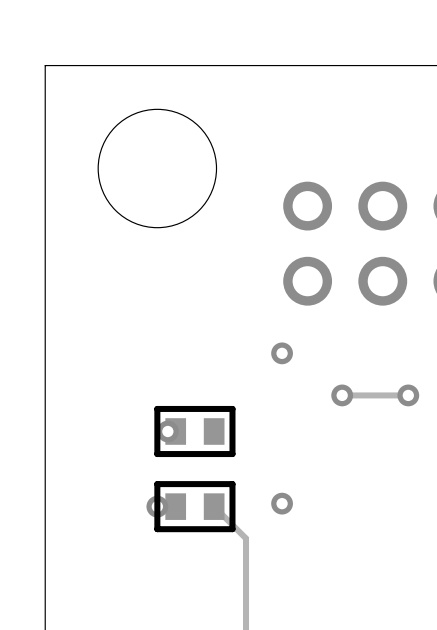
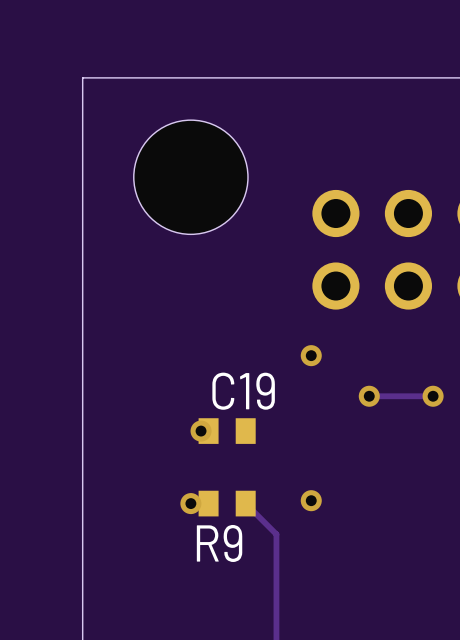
C19 name: none -> C19 (243, 391)
line: (232, 408) (232, 454) (157, 454) (157, 408) (232, 408) -> none
line: (232, 484) (232, 529) (157, 529) (157, 484) (232, 484) -> none
R9 name: none -> R9 (219, 543)

